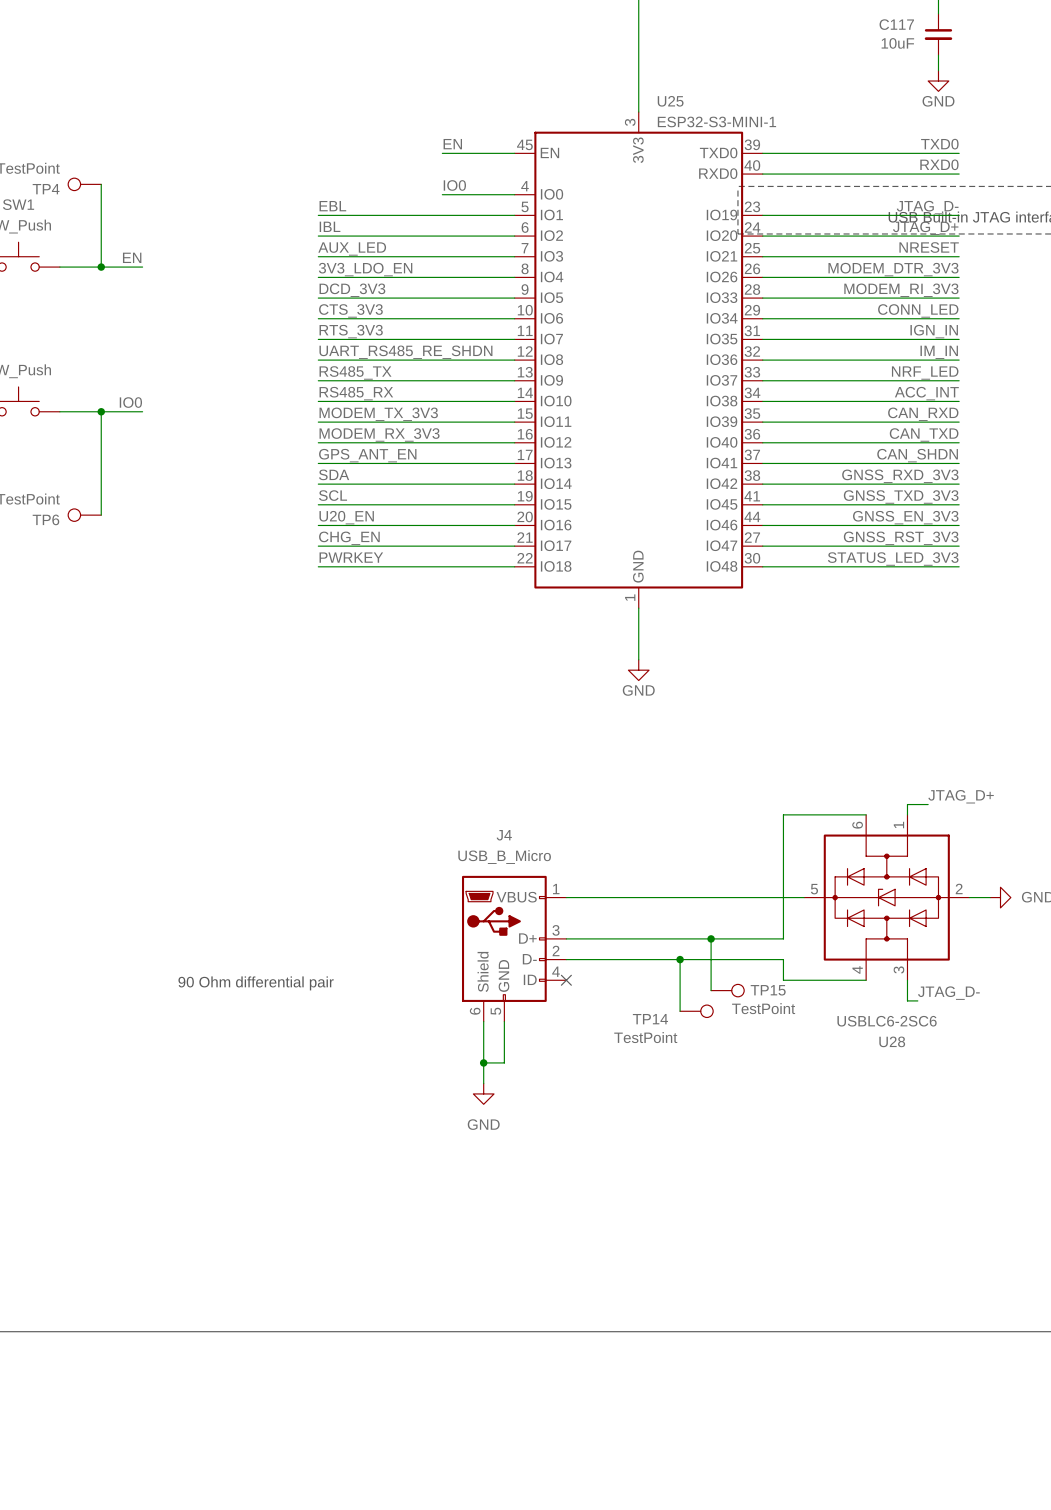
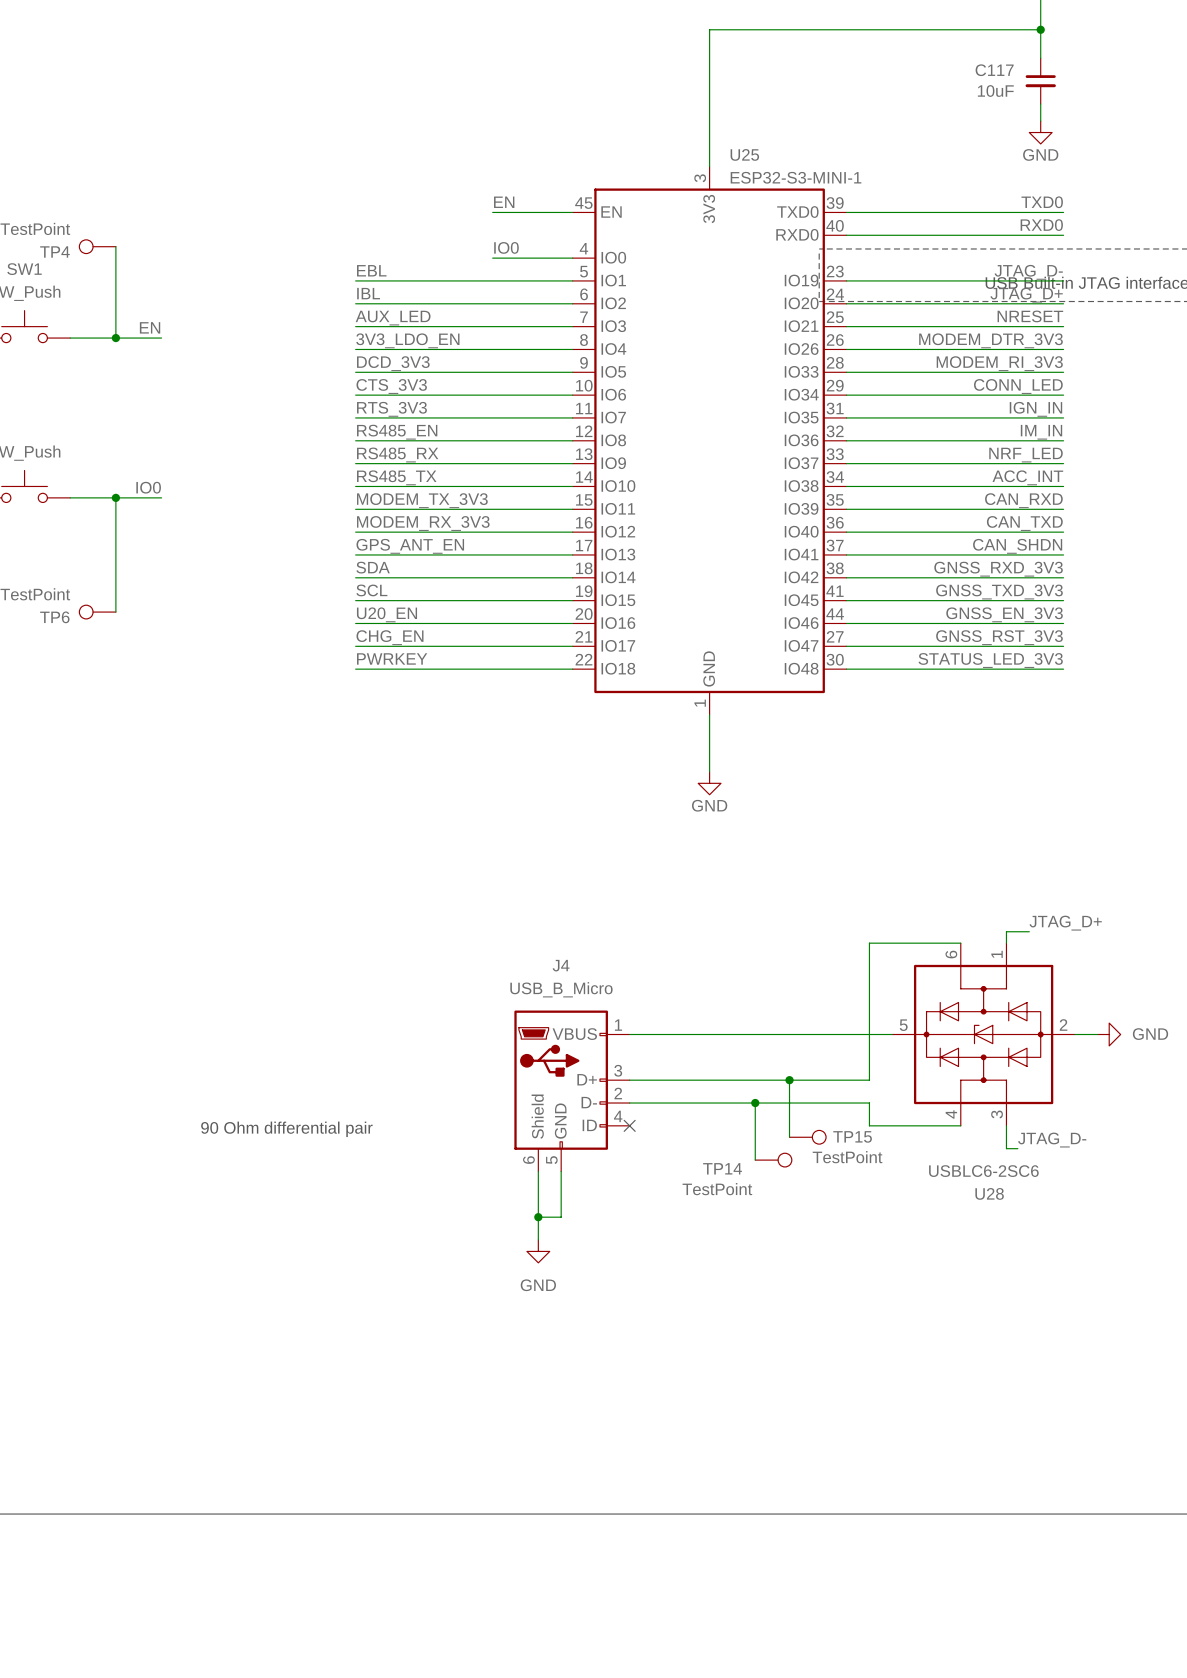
label: UART_RS485_RE_SHDN (405, 352) -> RS485_EN (397, 432)
label: RS485_TX (355, 372) -> RS485_RX (397, 455)
label: RS485_RX (356, 393) -> RS485_TX (396, 477)

